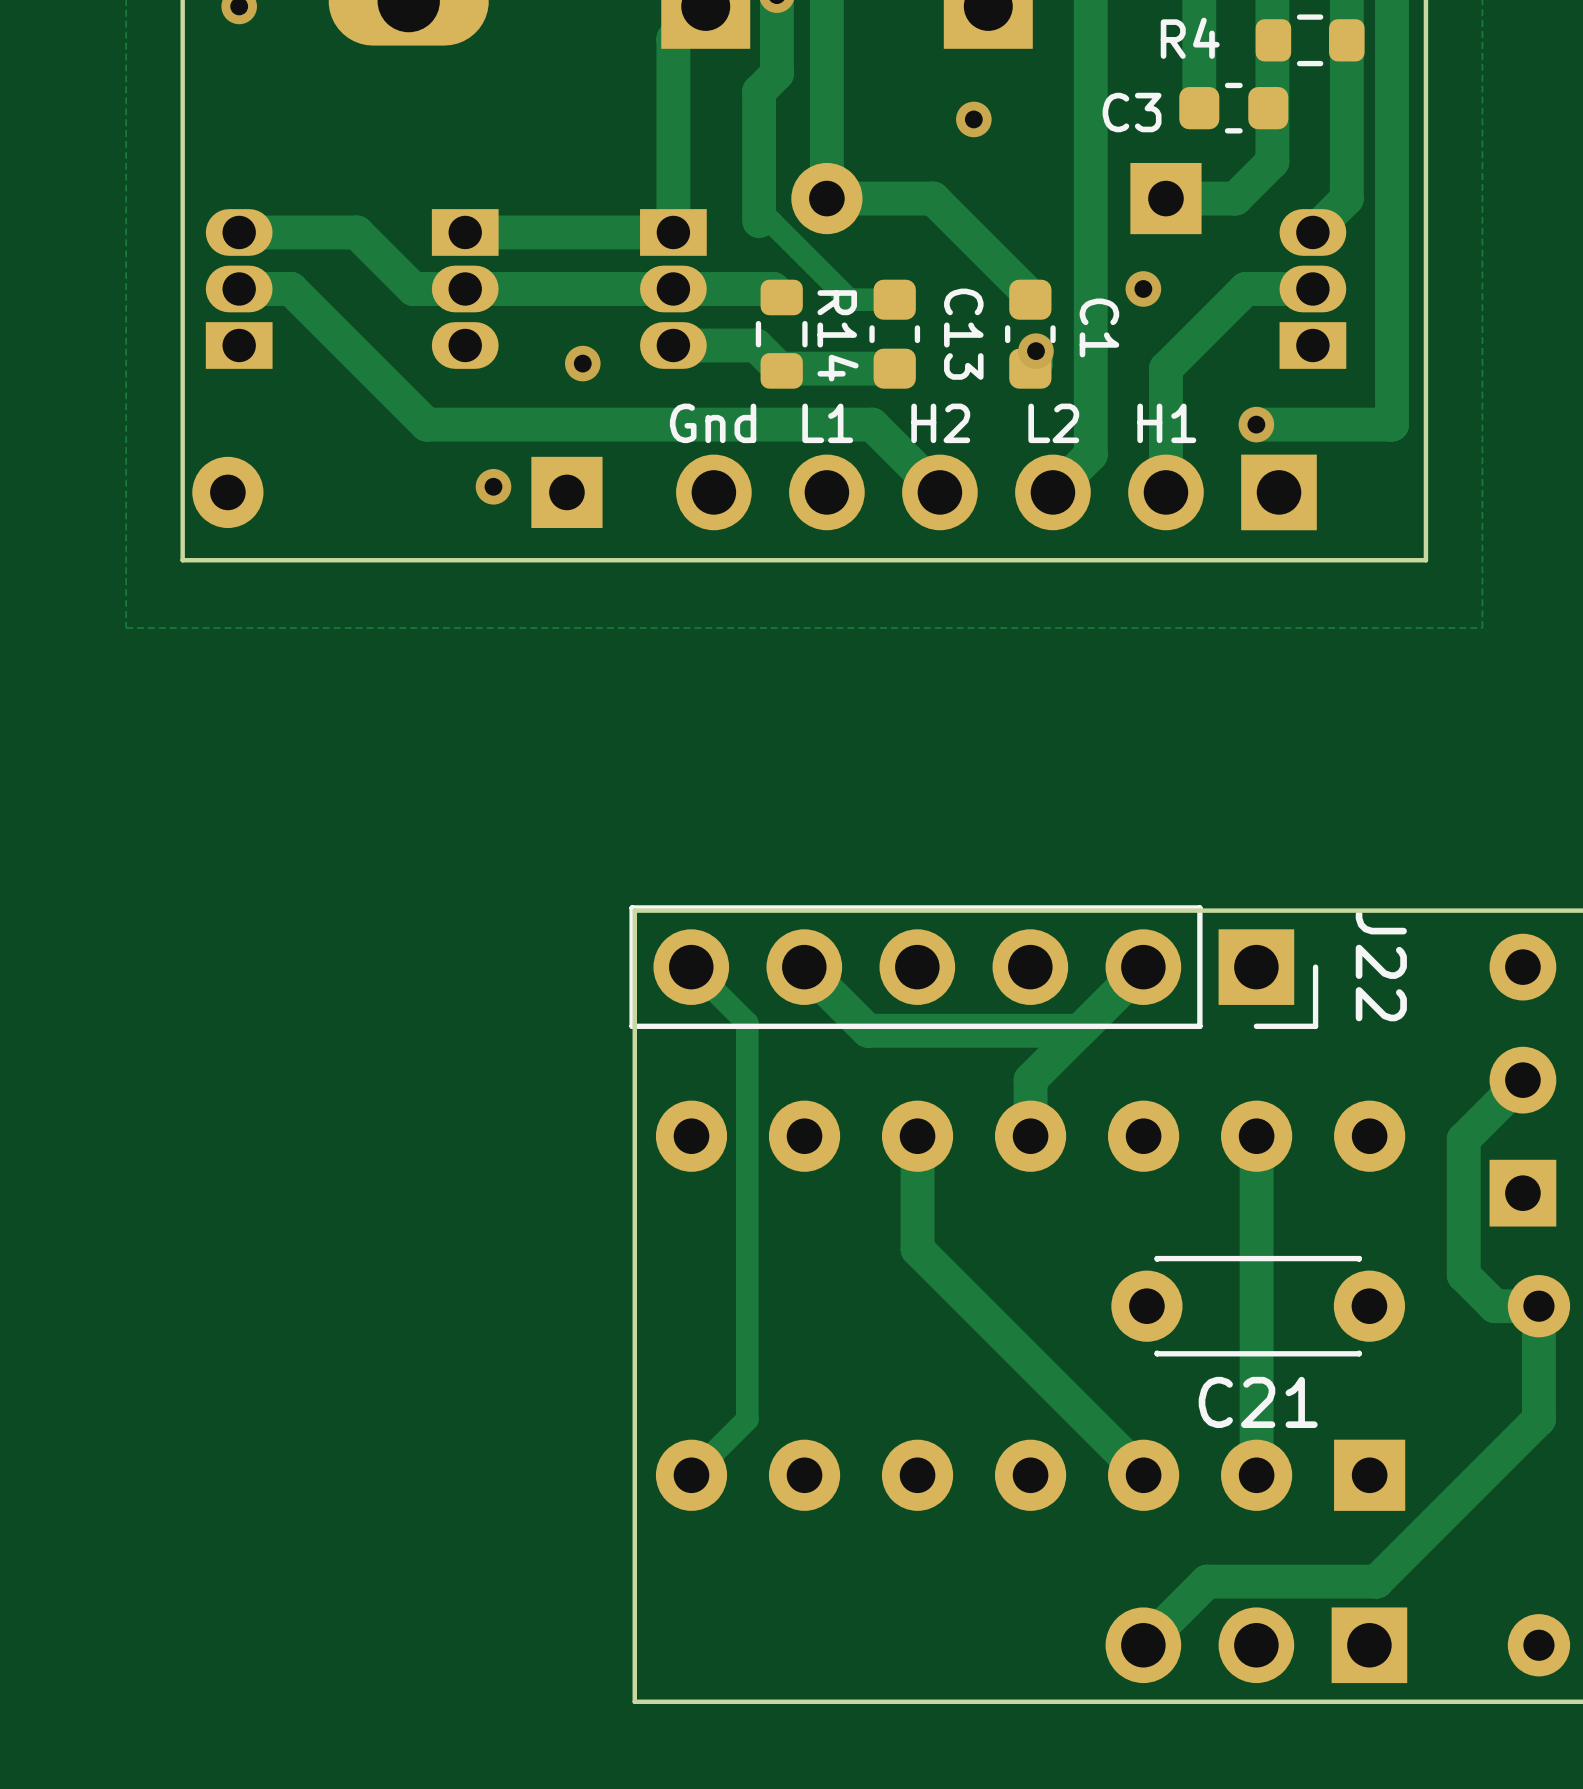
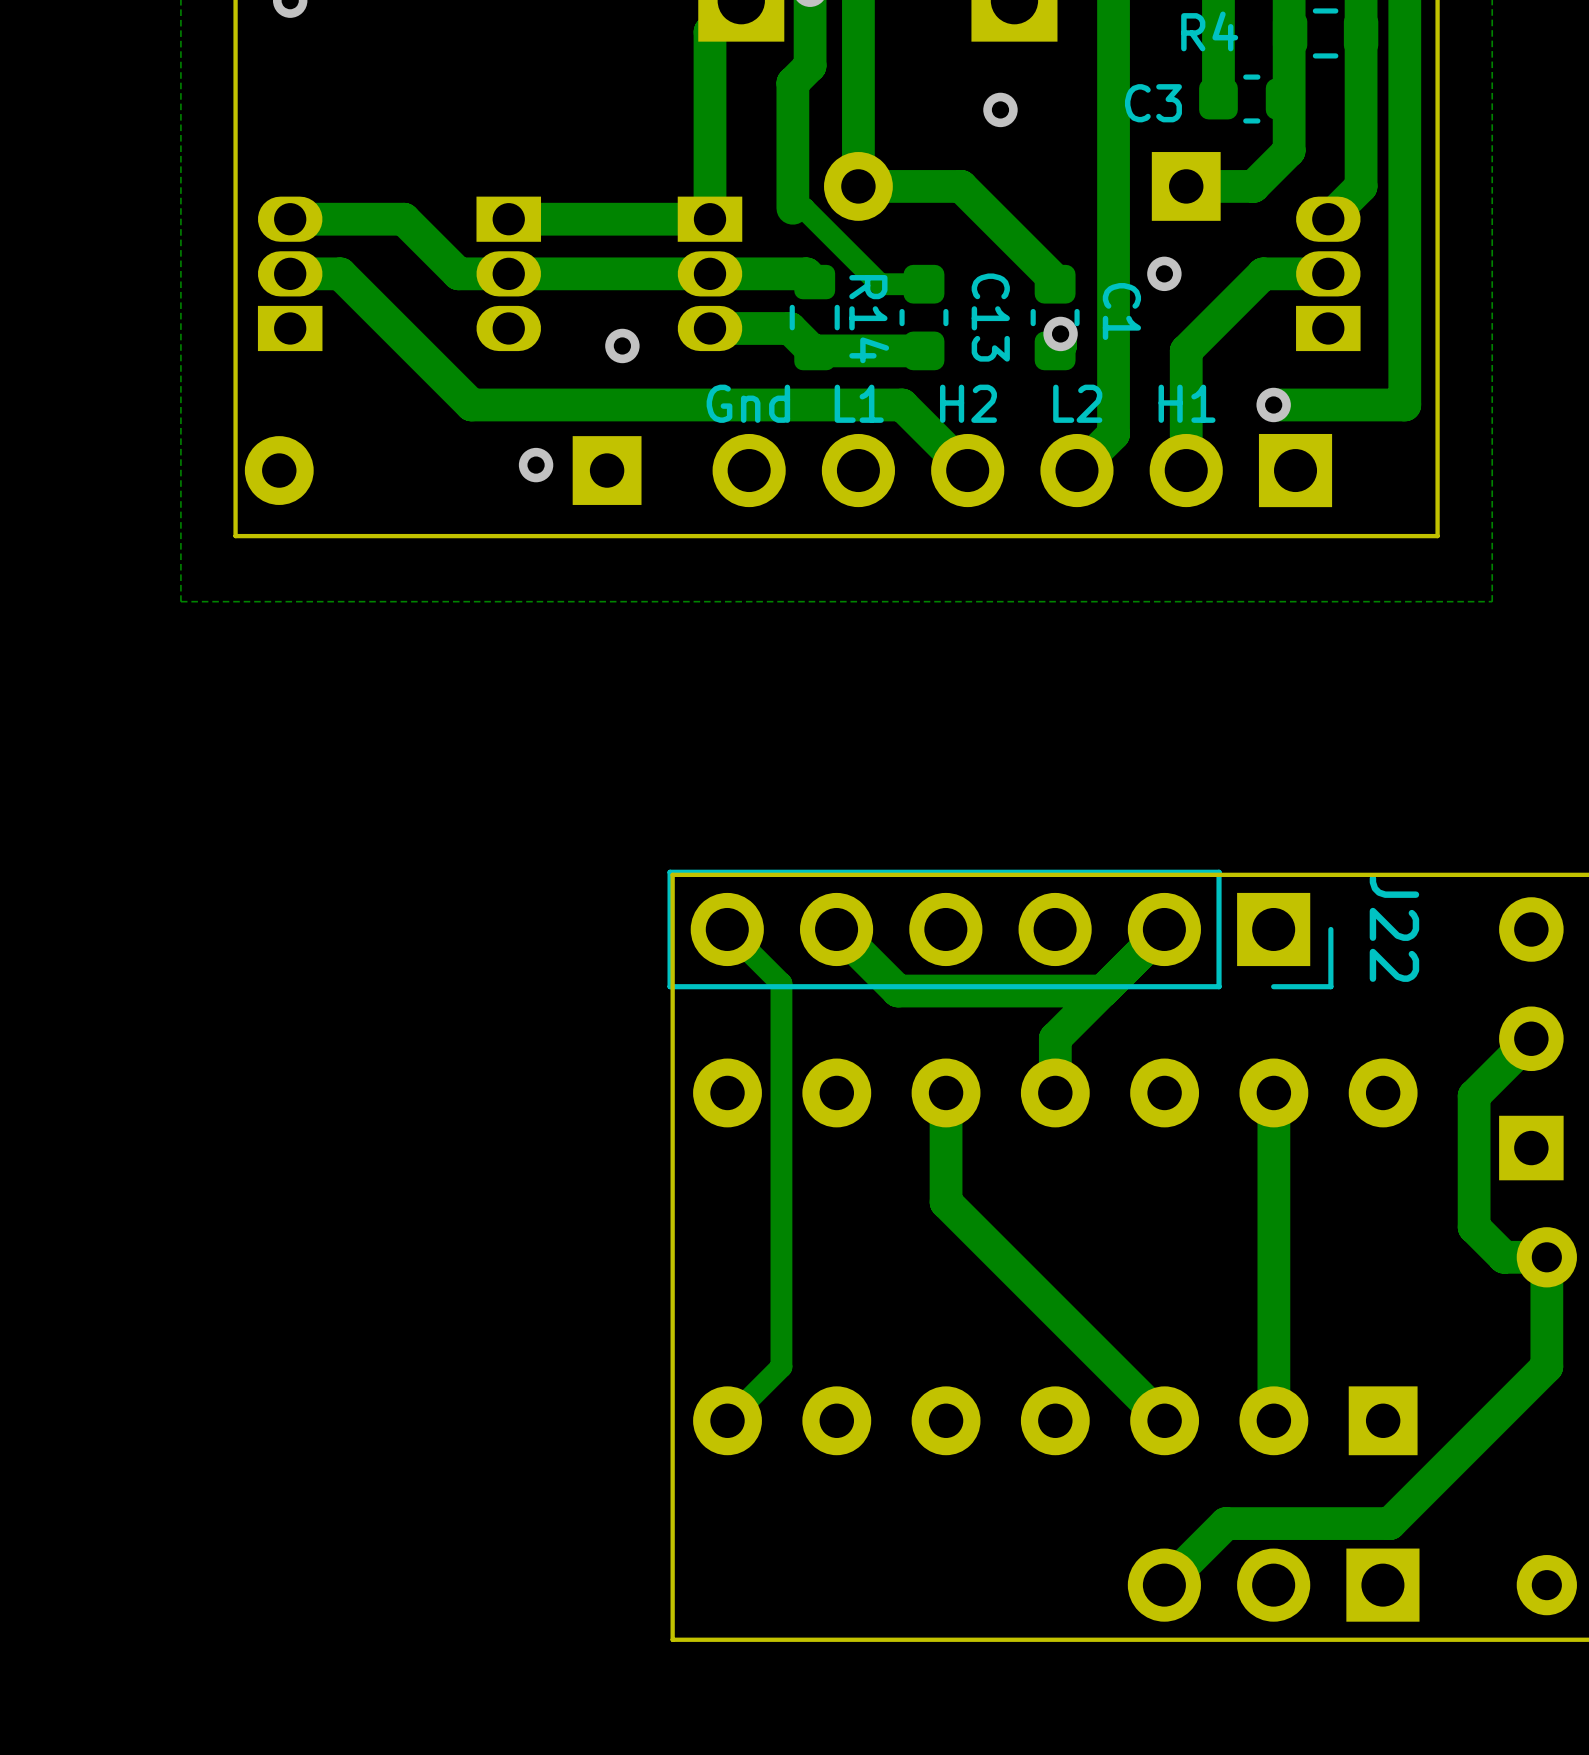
C21: (1258, 1306) -> none

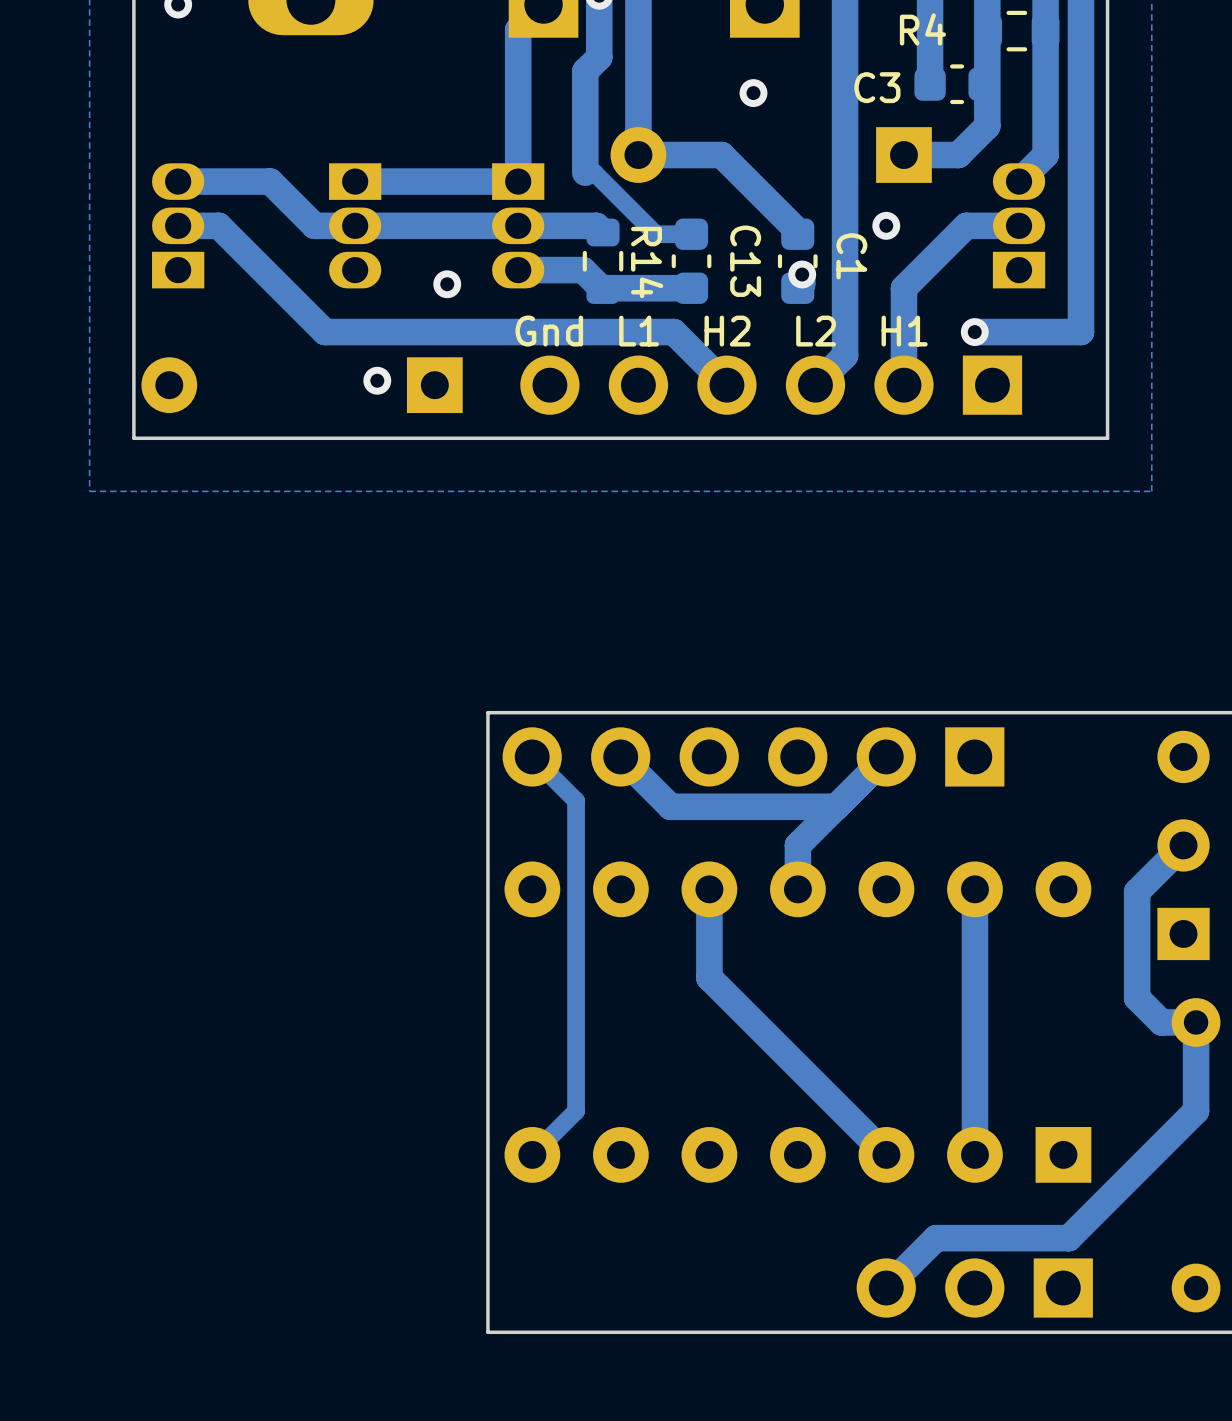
J22: (1000, 929) -> none

